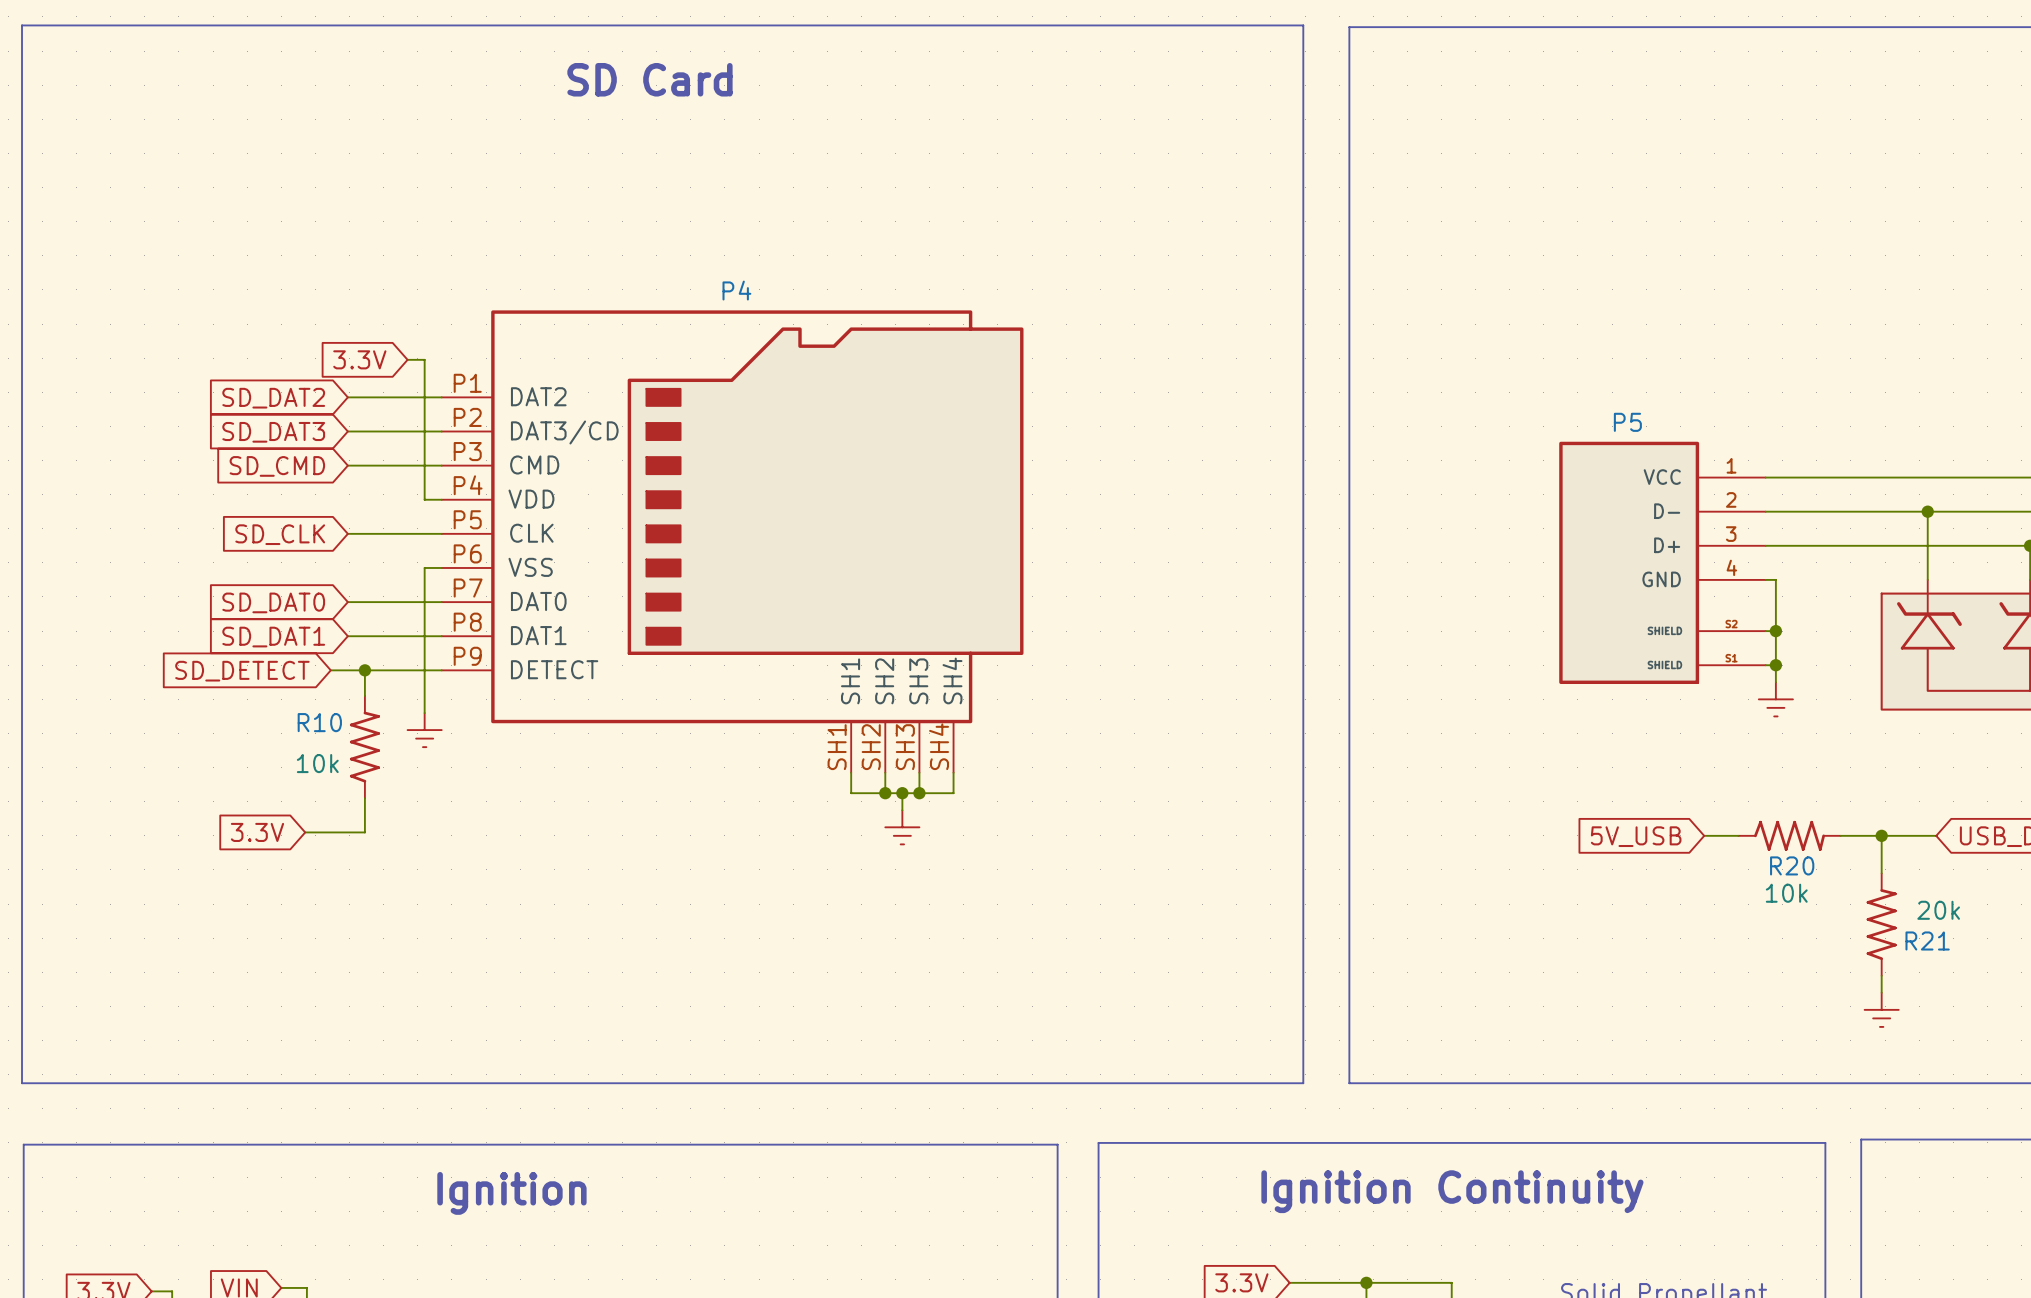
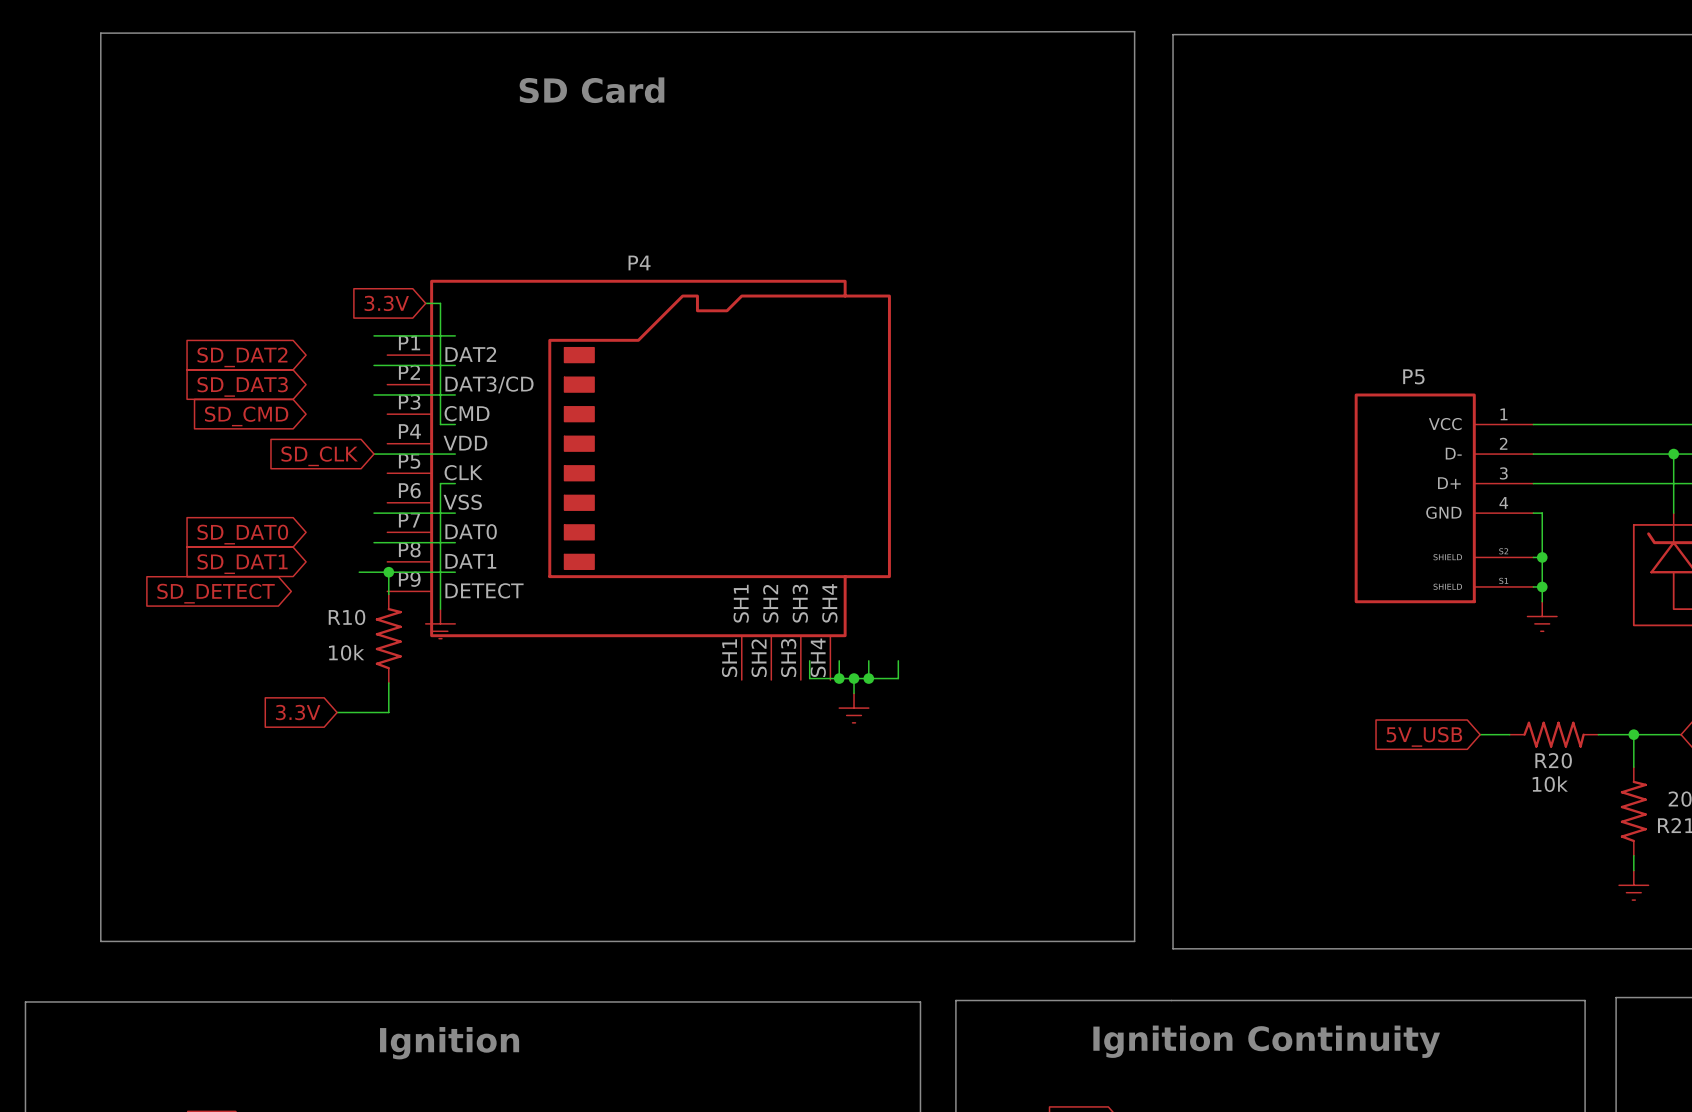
line: (22, 25) (1303, 25) (1303, 1083) (22, 1083) (22, 25) -> (1134, 31) (100, 33) (100, 941) (1134, 941) (1134, 31)
text position: SD Card (649, 79) -> SD Card (591, 90)
global label position: 3.3V (359, 359) -> 3.3V (386, 303)
wire: (407, 359) (424, 359) (424, 499) (441, 499) -> (425, 303) (440, 303) (440, 424) (455, 424)
wire: (347, 397) (441, 397) -> (374, 335) (455, 335)
wire: (347, 431) (441, 431) -> (374, 365) (455, 365)
wire: (347, 465) (441, 465) -> (374, 394) (455, 394)
wire: (347, 533) (441, 533) -> (374, 454) (455, 454)
global label position: SD_CLK (280, 534) -> SD_CLK (319, 456)
wire: (441, 567) (424, 567) (424, 713) -> (455, 483) (440, 483) (440, 609)
wire: (347, 602) (441, 602) -> (374, 513) (455, 513)
wire: (347, 636) (441, 636) -> (374, 542) (455, 542)
junction: none -> (388, 572)
wire: (330, 670) (441, 670) -> (359, 572) (455, 572)
wire: (364, 670) (364, 695) -> (388, 572) (388, 594)
junction: (364, 670) -> none
power symbol position: (424, 730) -> (440, 623)
R10 position: (364, 747) -> (388, 638)
junction: none -> (839, 678)
junction: none -> (854, 678)
junction: none -> (868, 678)
wire: (851, 772) (851, 793) (953, 793) (953, 772) -> (809, 660) (809, 678) (898, 678) (898, 660)
wire: (885, 772) (885, 793) -> (839, 660) (839, 678)
wire: (919, 772) (919, 793) -> (868, 660) (868, 678)
junction: (885, 793) -> none
wire: (902, 793) (902, 810) -> (854, 678) (854, 693)
junction: (902, 793) -> none
junction: (919, 793) -> none
wire: (364, 798) (364, 832) (305, 832) -> (388, 682) (388, 712) (337, 712)
power symbol position: (902, 827) -> (854, 708)
global label position: 3.3V (257, 832) -> 3.3V (298, 712)

